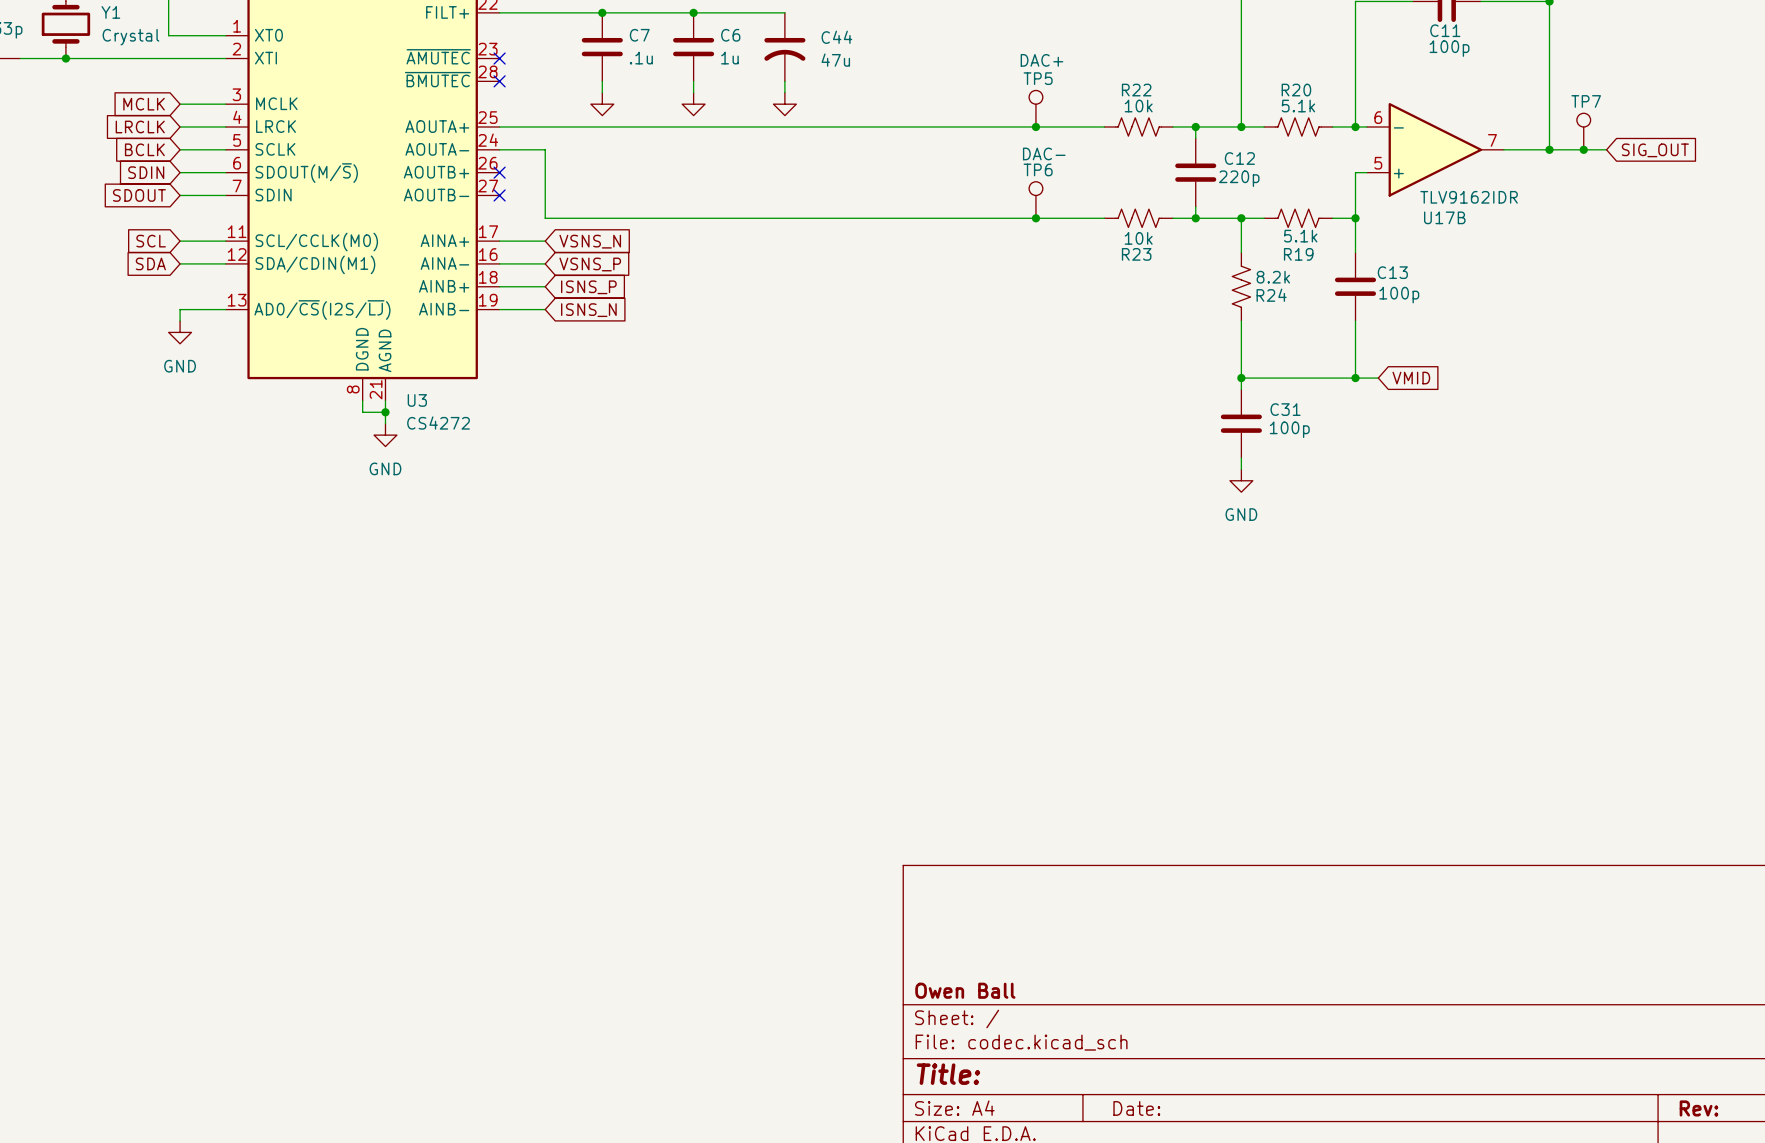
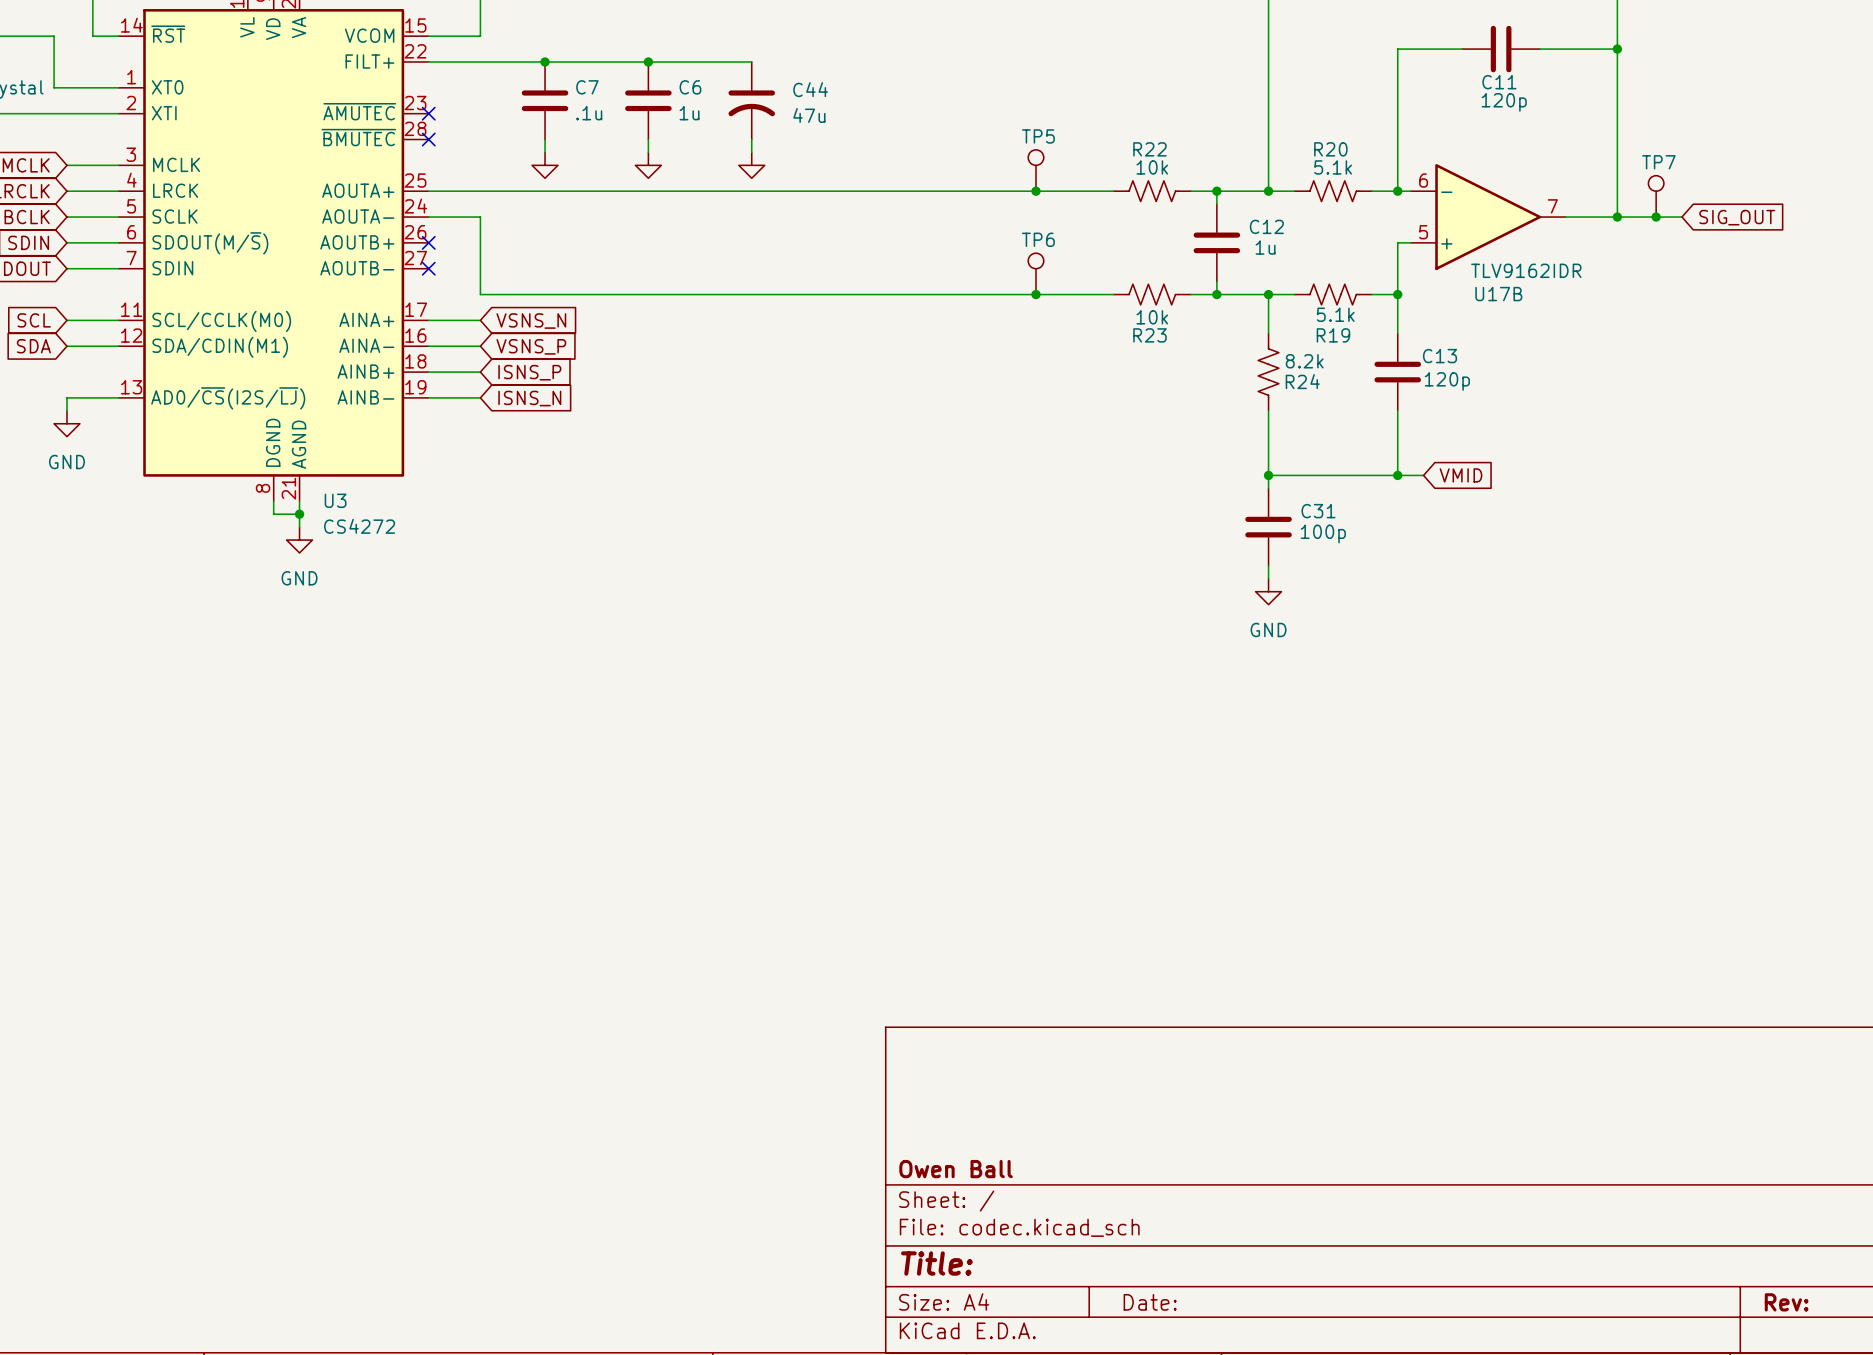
C11 value: 100p (1449, 48) -> 120p (1504, 102)
TP5 value: DAC+ (1041, 60) -> none
TP6 value: DAC- (1044, 153) -> none
C12 value: 220p (1239, 178) -> 1u (1265, 247)
C13 value: 100p (1399, 295) -> 120p (1447, 381)

